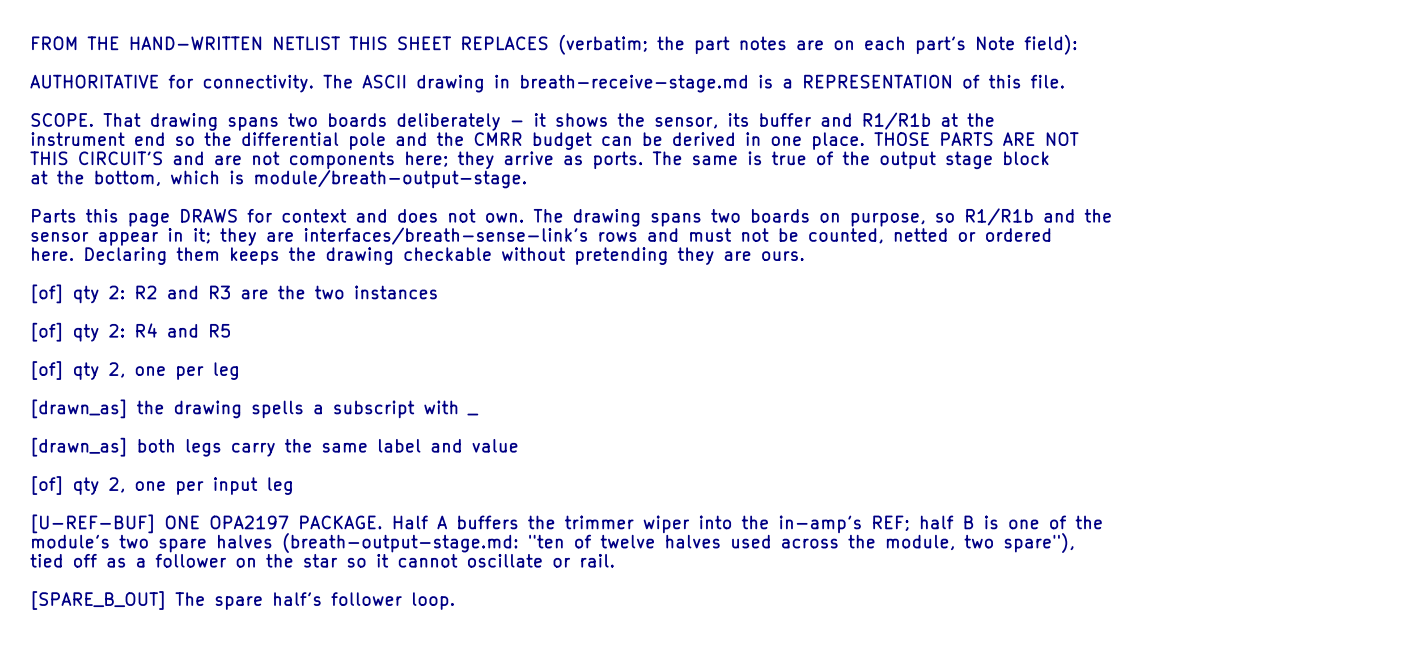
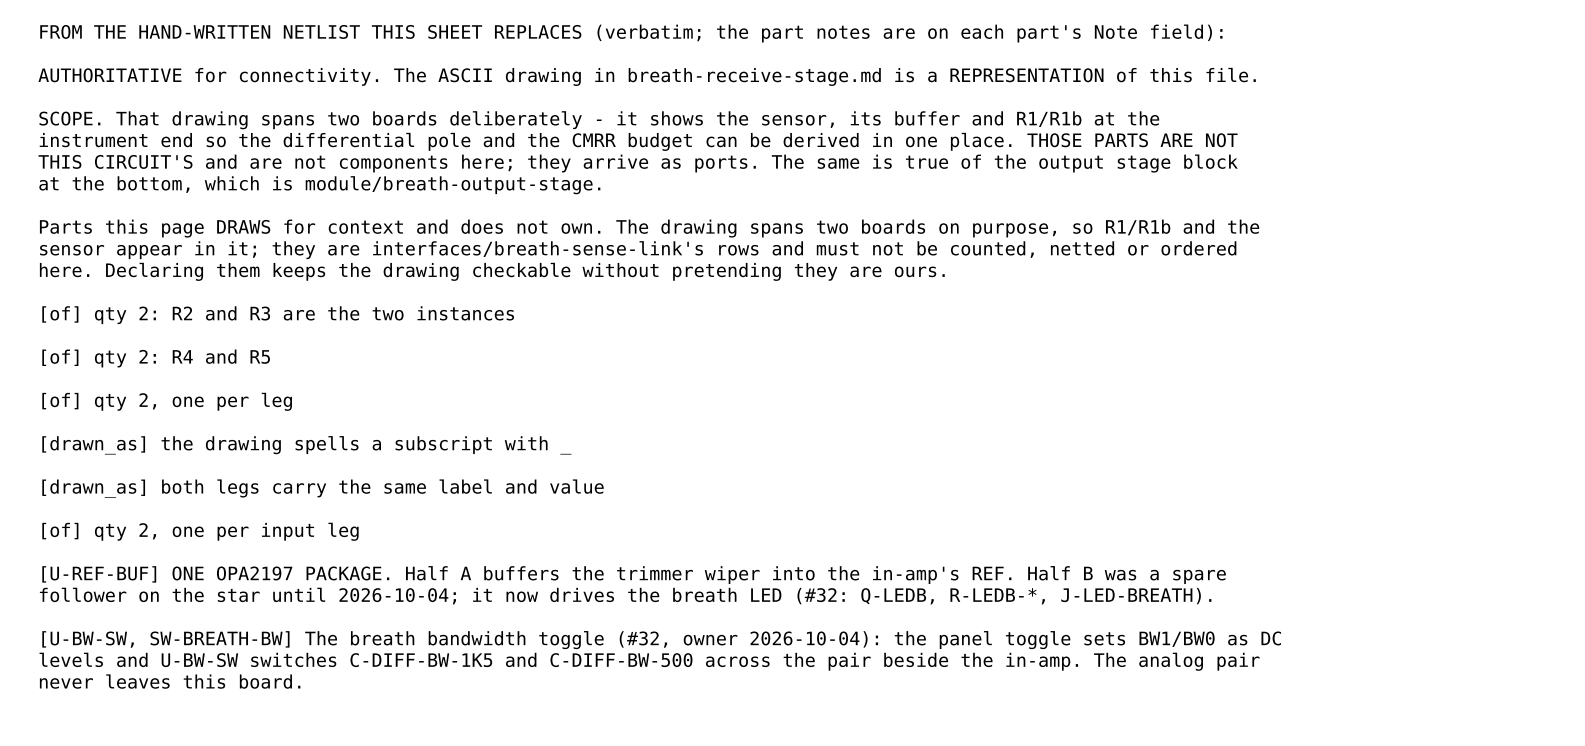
text: [U-REF-BUF] ONE OPA2197 PACKAGE. Half A buffers the trimmer wiper into the in-amp's REF; half B is one of the (567, 523) -> [U-REF-BUF] ONE OPA2197 PACKAGE. Half A buffers the trimmer wiper into the in-amp's REF. Half B was a spare (634, 575)
text: module's two spare halves (breath-output-stage.md: "ten of twelve halves used across the module, two spare"), (552, 543) -> follower on the star until 2026-10-04; it now drives the breath LED (#32: Q-LEDB, R-LEDB-*, J-LED-BREATH). (625, 596)
text: tied off as a follower on the star so it cannot oscillate or rail. (322, 560) -> none
text: none -> [U-BW-SW, SW-BREATH-BW] The breath bandwidth toggle (#32, owner 2026-10-04): the panel toggle sets BW1/BW0 as DC (661, 640)
text: [SPARE_B_OUT] The spare half's follower loop. (243, 600) -> levels and U-BW-SW switches C-DIFF-BW-1K5 and C-DIFF-BW-500 across the pair beside the in-amp. The analog pair (649, 661)
text: none -> never leaves this board. (170, 681)

